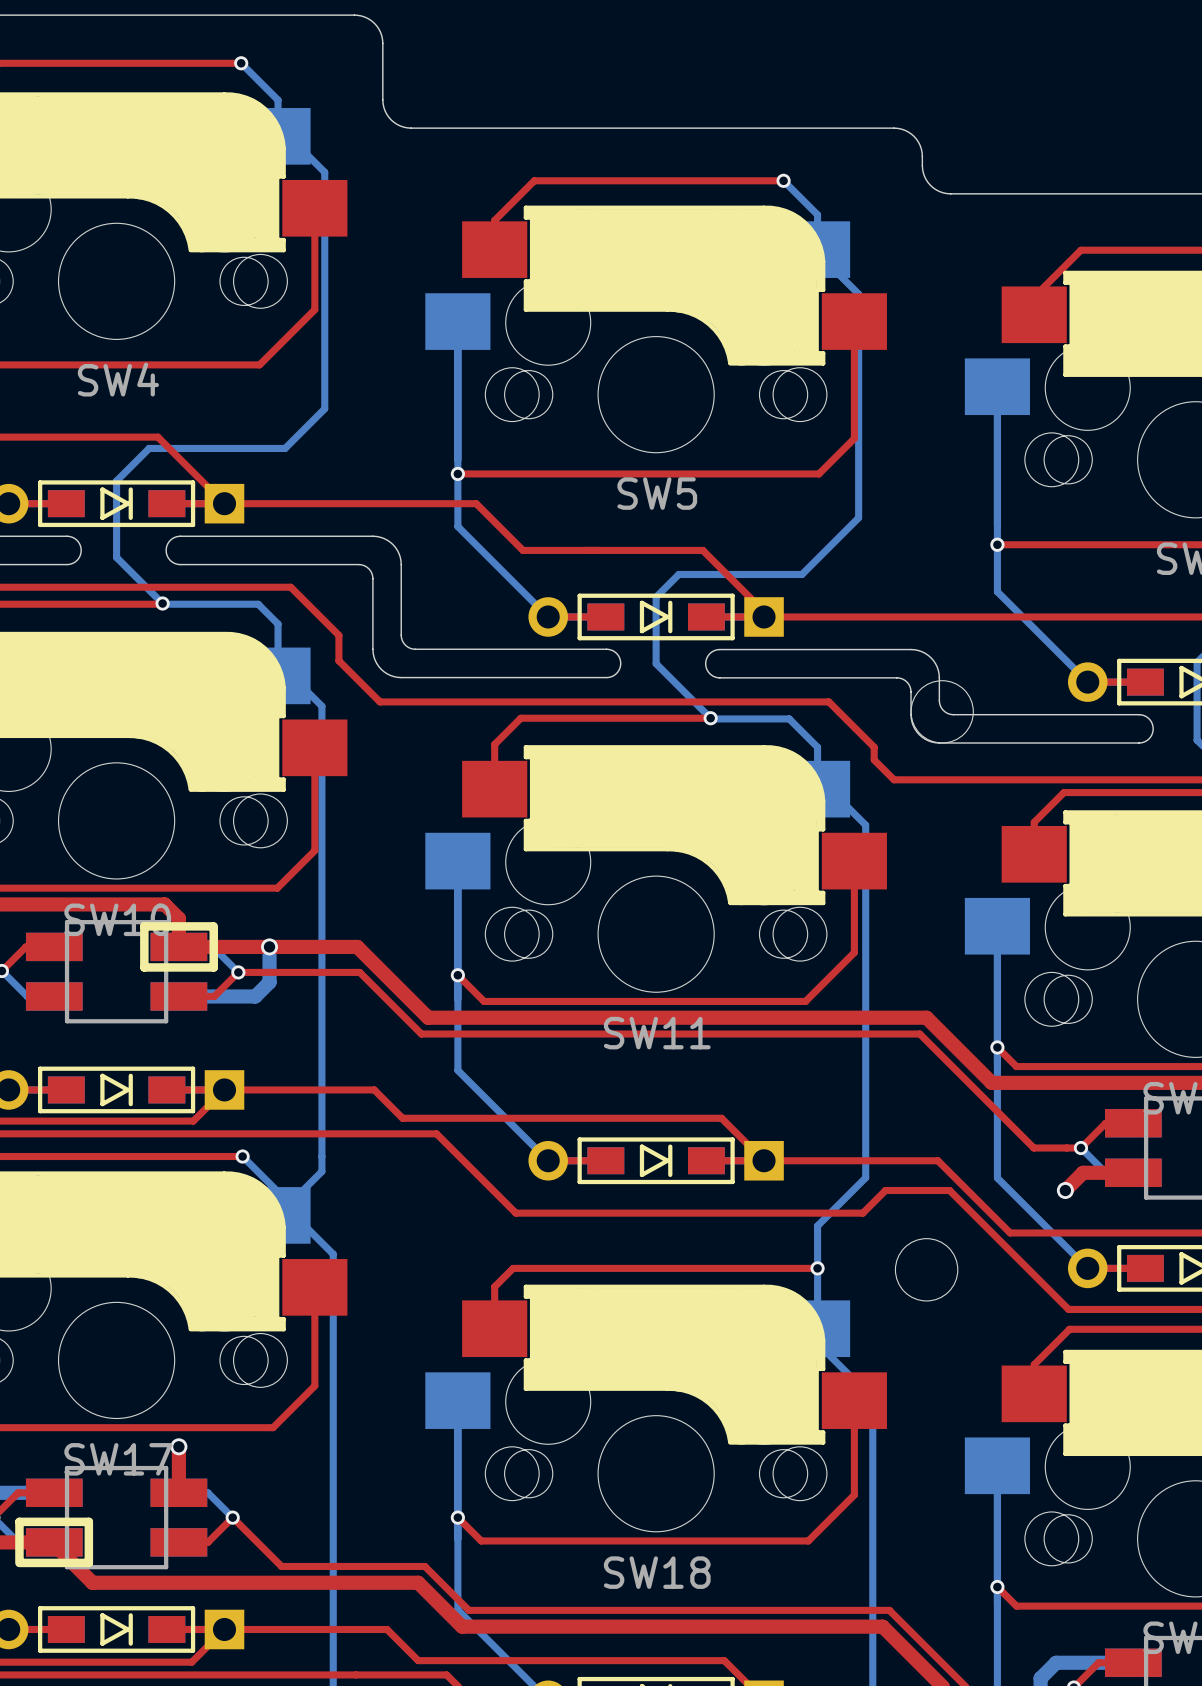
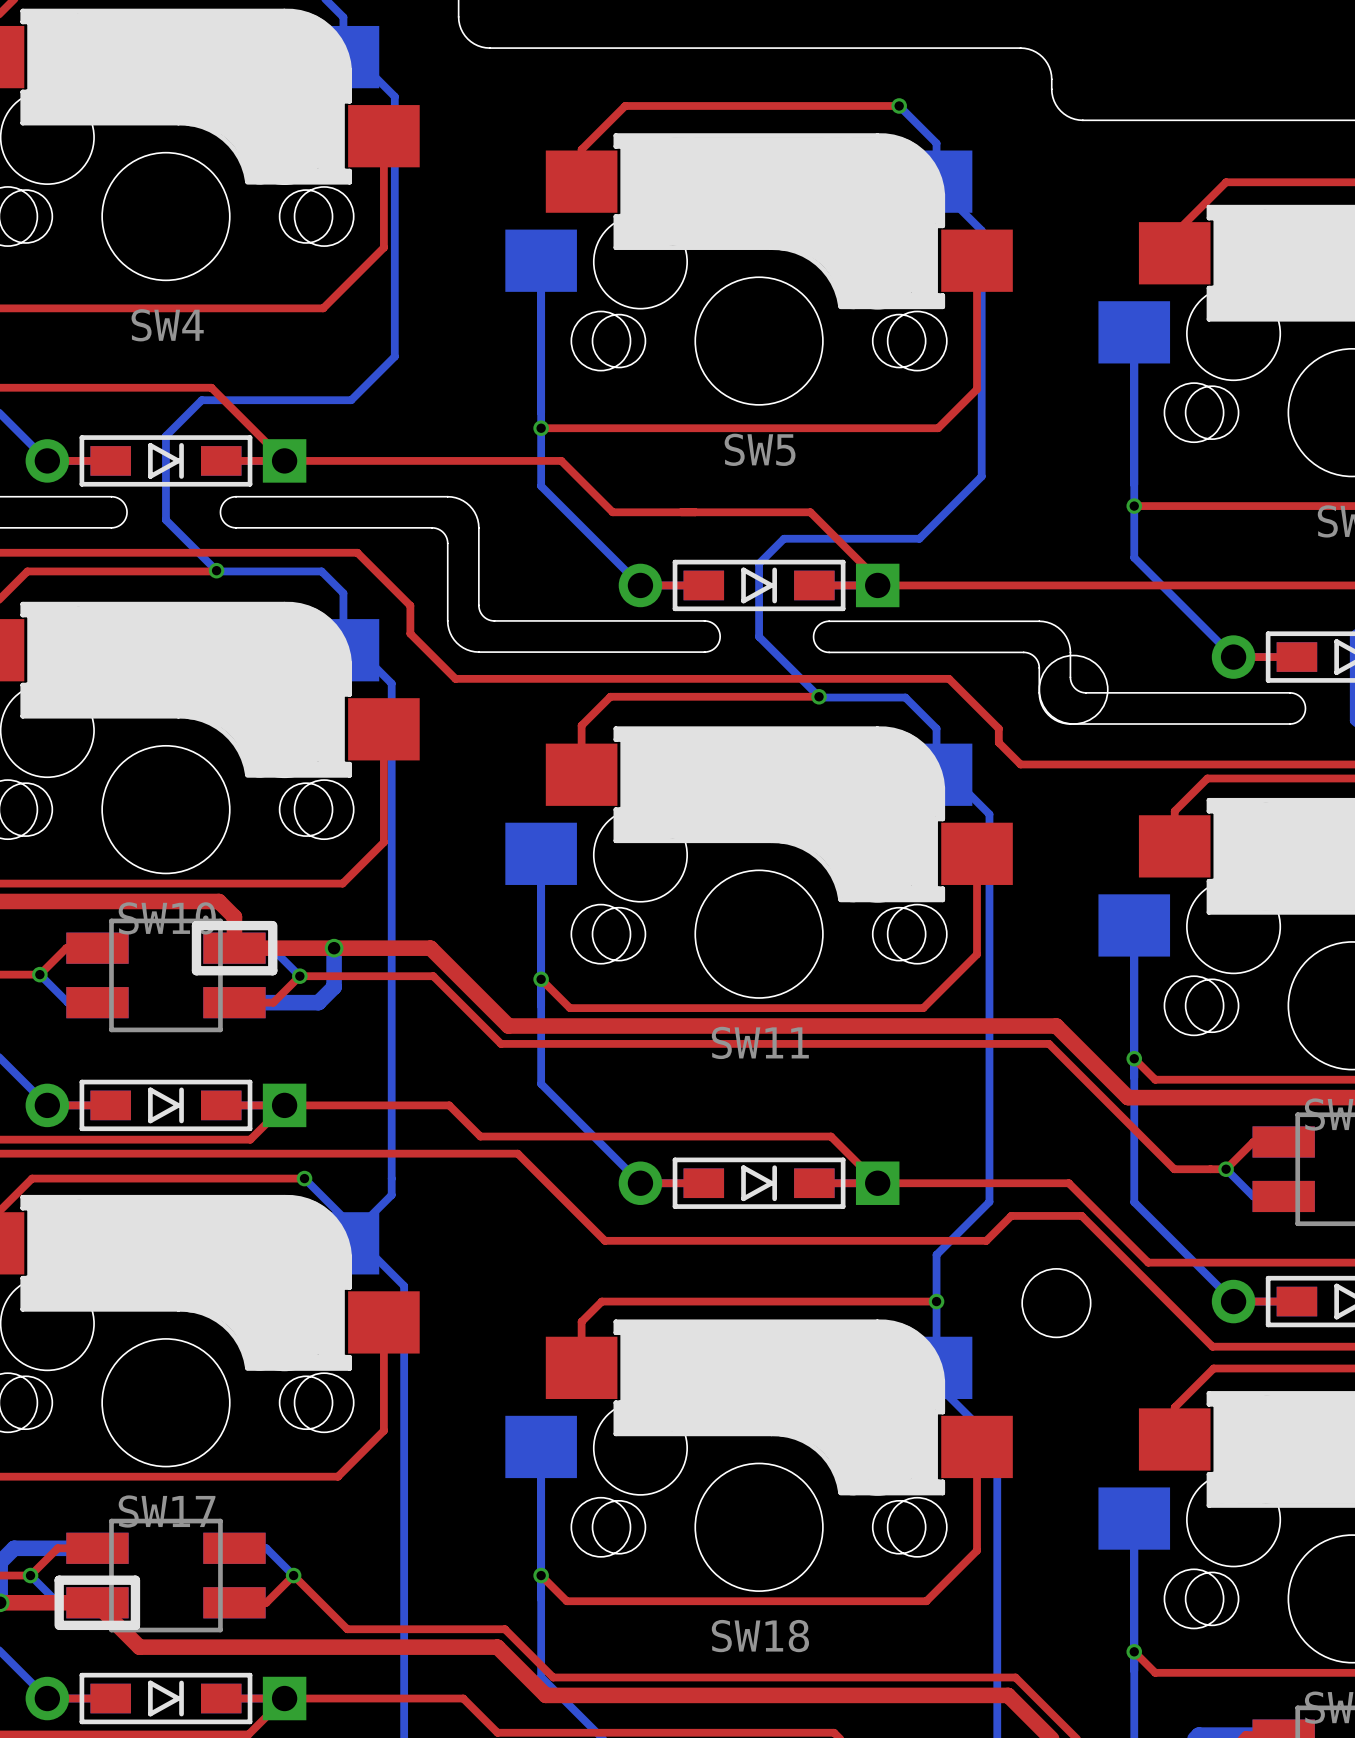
top track: (1133, 1172) (1083, 1172) (1065, 1190) -> none
via: (1065, 1190) -> none
top track: (178, 1446) (178, 1492) -> none
via: (178, 1446) -> none

